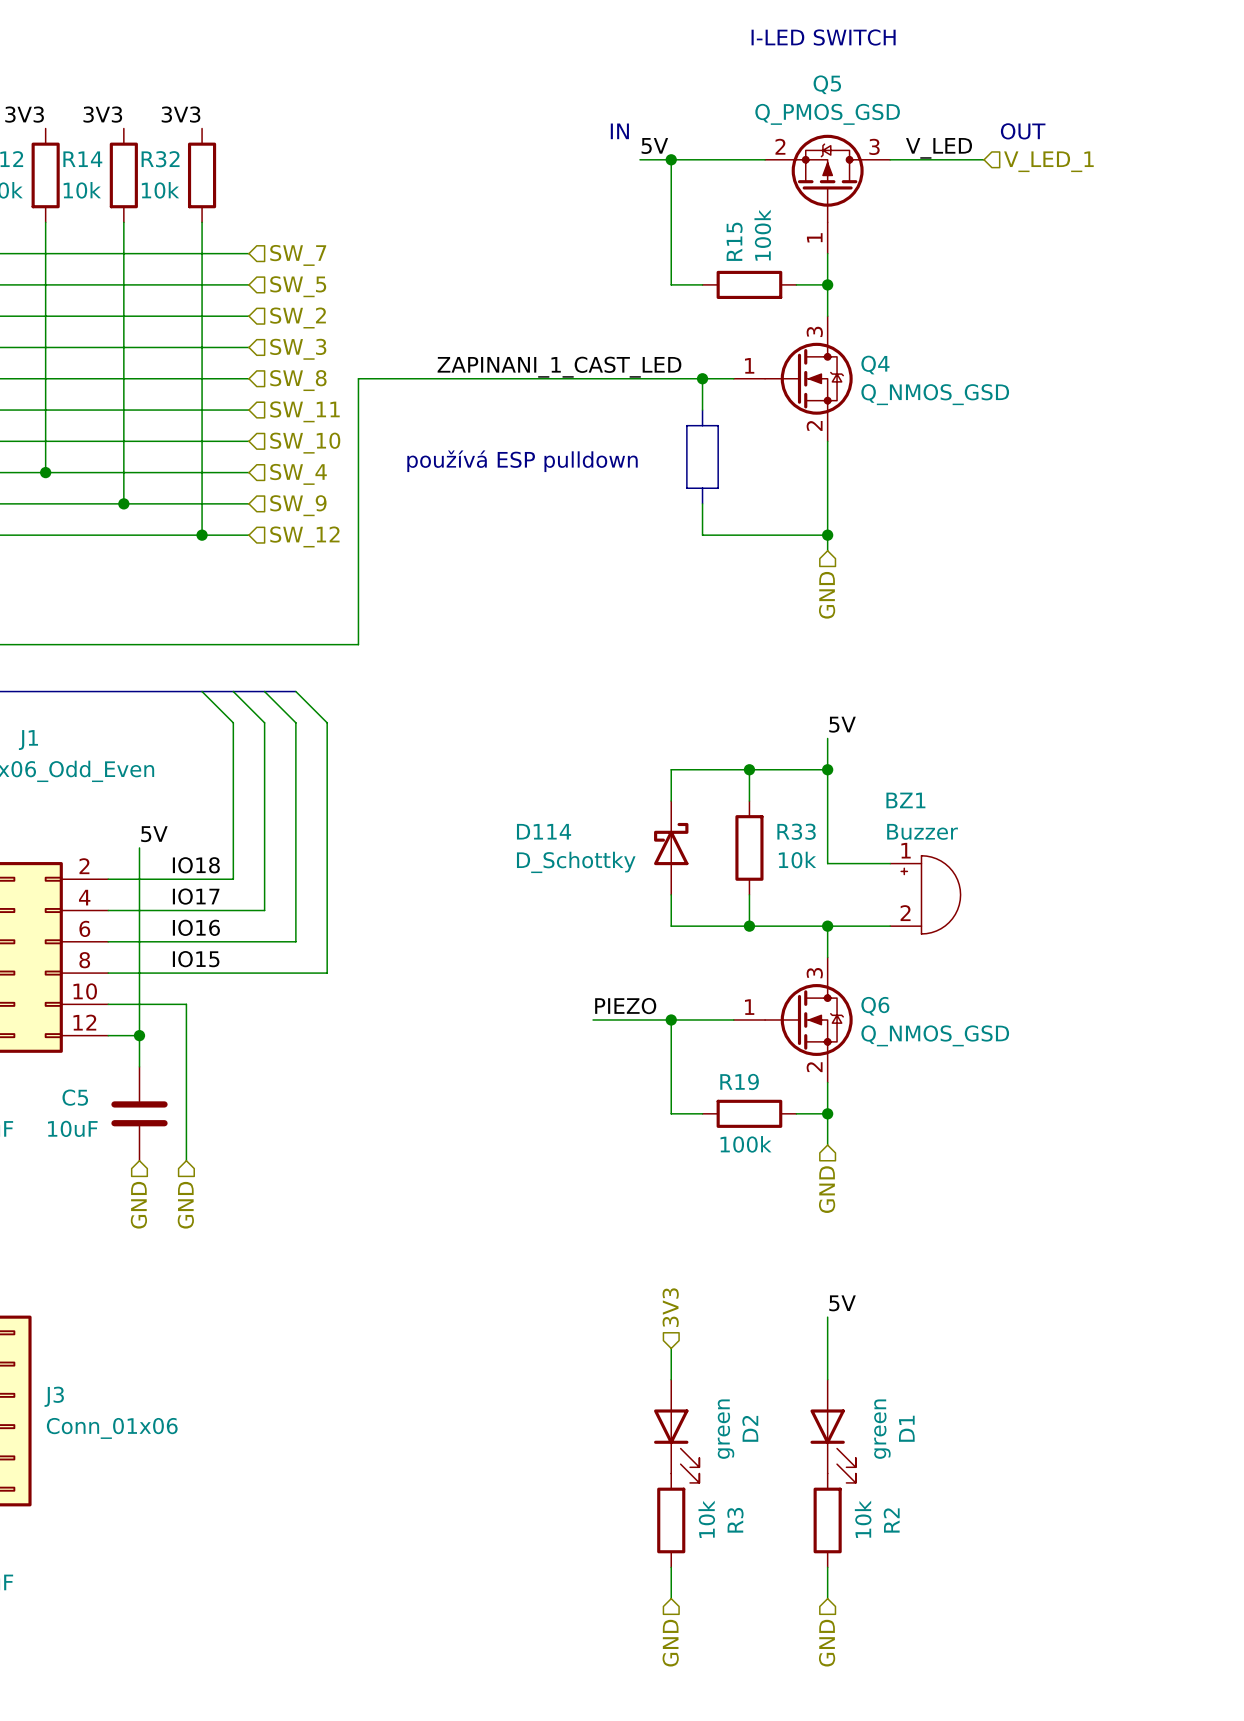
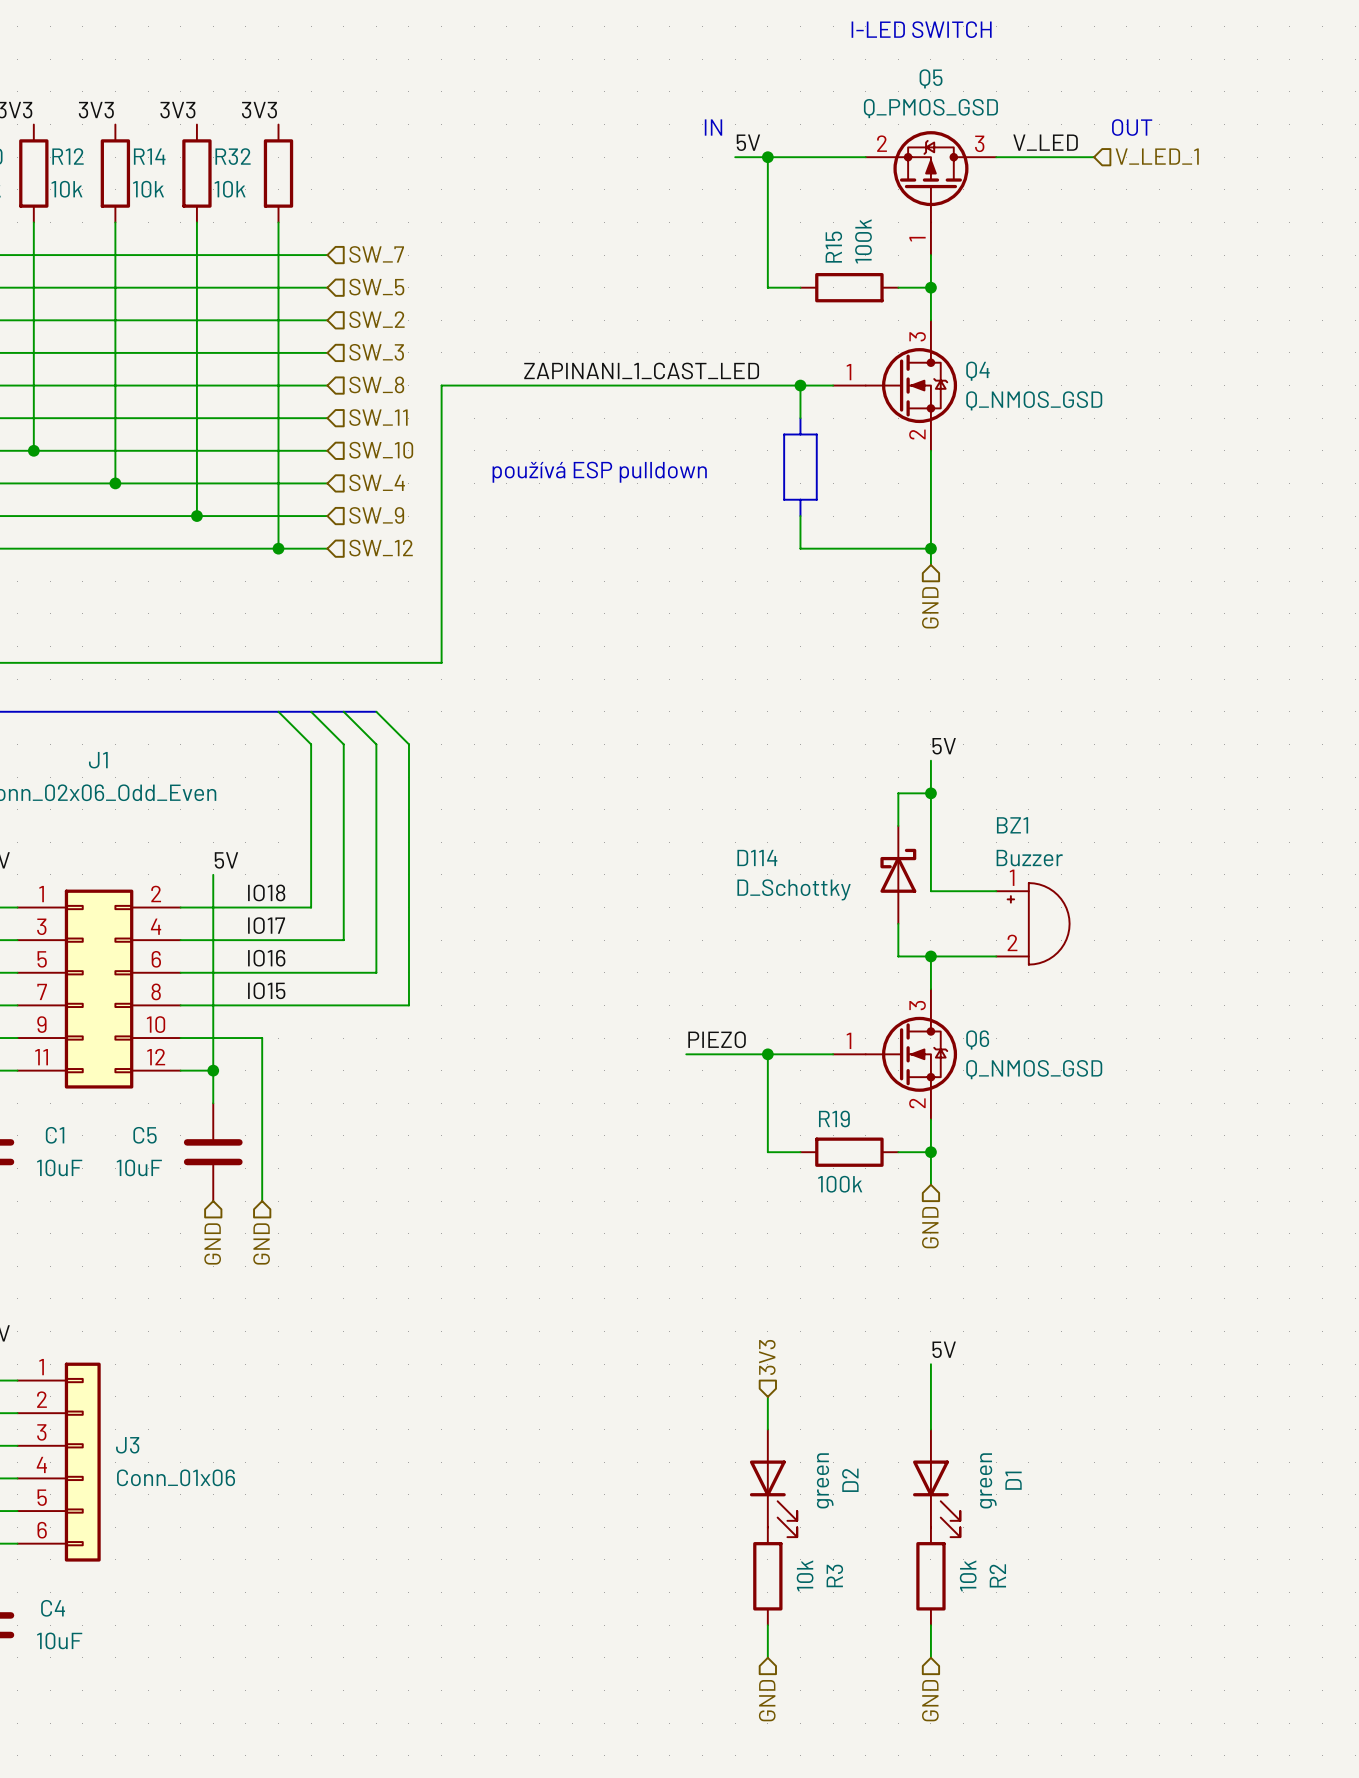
wire: (749, 769) (749, 801) -> none
junction: (749, 769) -> none
wire: (796, 769) (671, 769) (671, 801) -> (898, 793) (898, 825)
D114 position: (671, 847) -> (898, 874)
R33: 10k (749, 847) -> none
wire: (671, 894) (671, 926) (796, 926) -> (898, 923) (898, 956)
wire: (749, 894) (749, 926) -> none
junction: (749, 926) -> none

